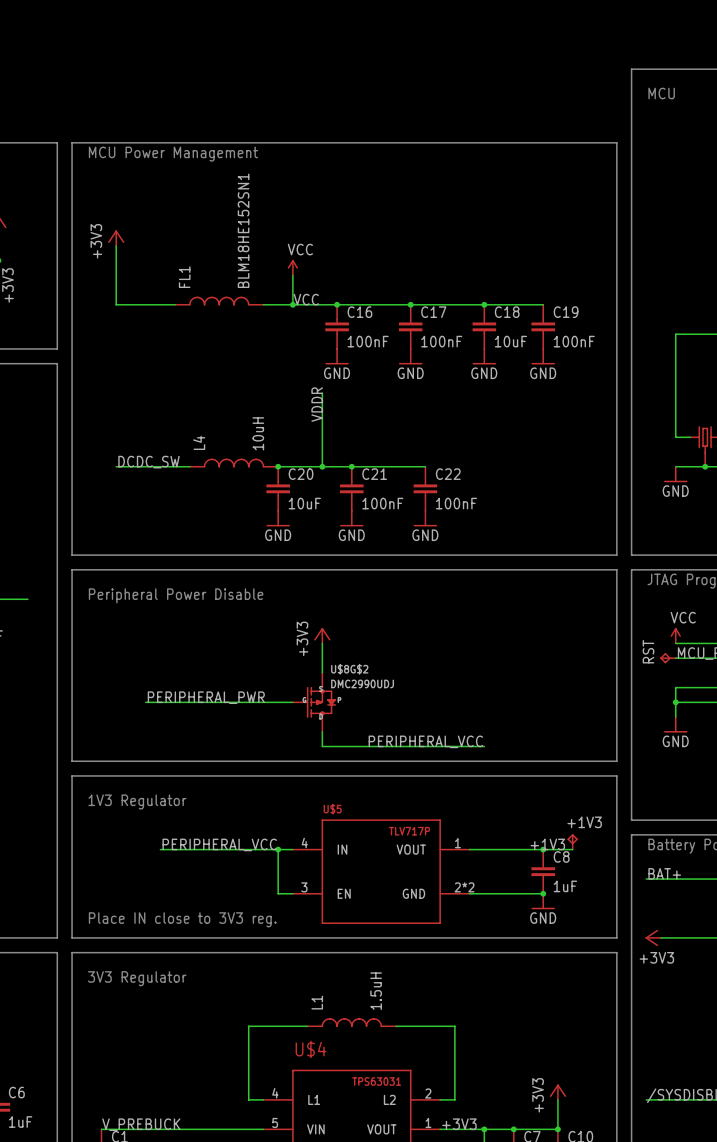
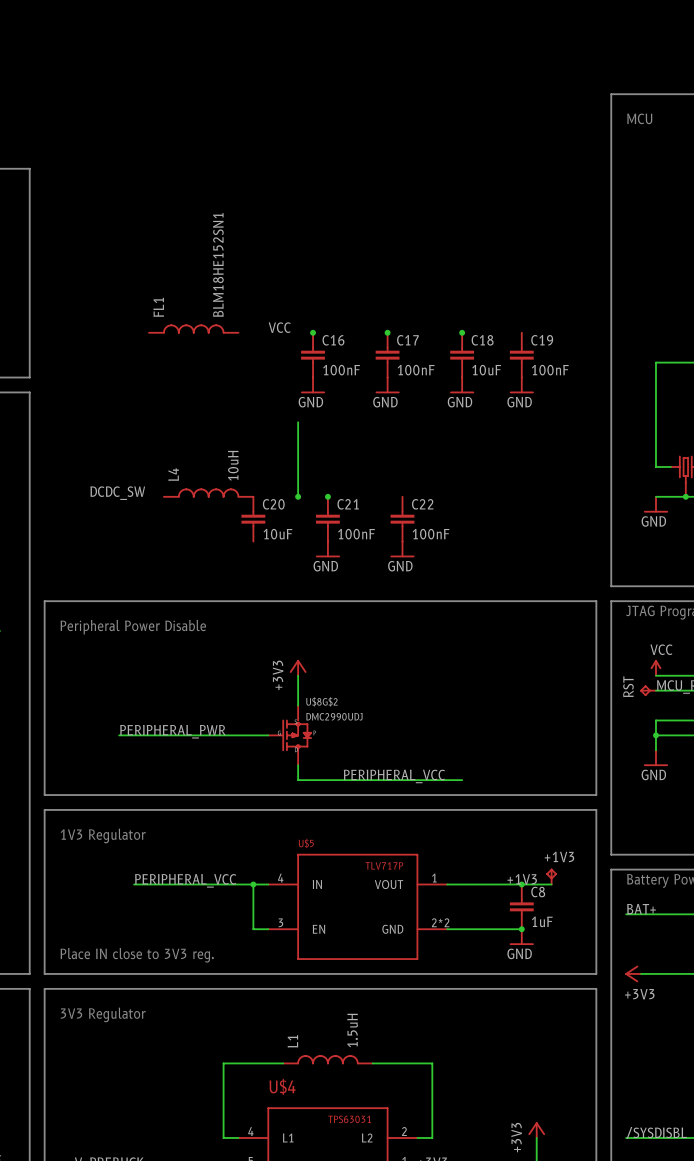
line: (72, 142) (72, 555) (616, 555) (616, 142) (72, 142) -> none
text: MCU Power Management (173, 154) -> none
power symbol: +3V3 (116, 238) -> none
wire: (116, 245) (116, 304) (175, 304) -> none
power symbol: VCC (292, 267) -> none
wire: (292, 275) (292, 304) -> none
wire: (263, 304) (543, 304) -> none
junction: (292, 304) -> none
label: VDDR (317, 404) -> none
wire: (116, 466) (189, 466) -> none
wire: (278, 466) (425, 466) -> none
junction: (278, 466) -> none
power symbol: GND (278, 518) -> none

